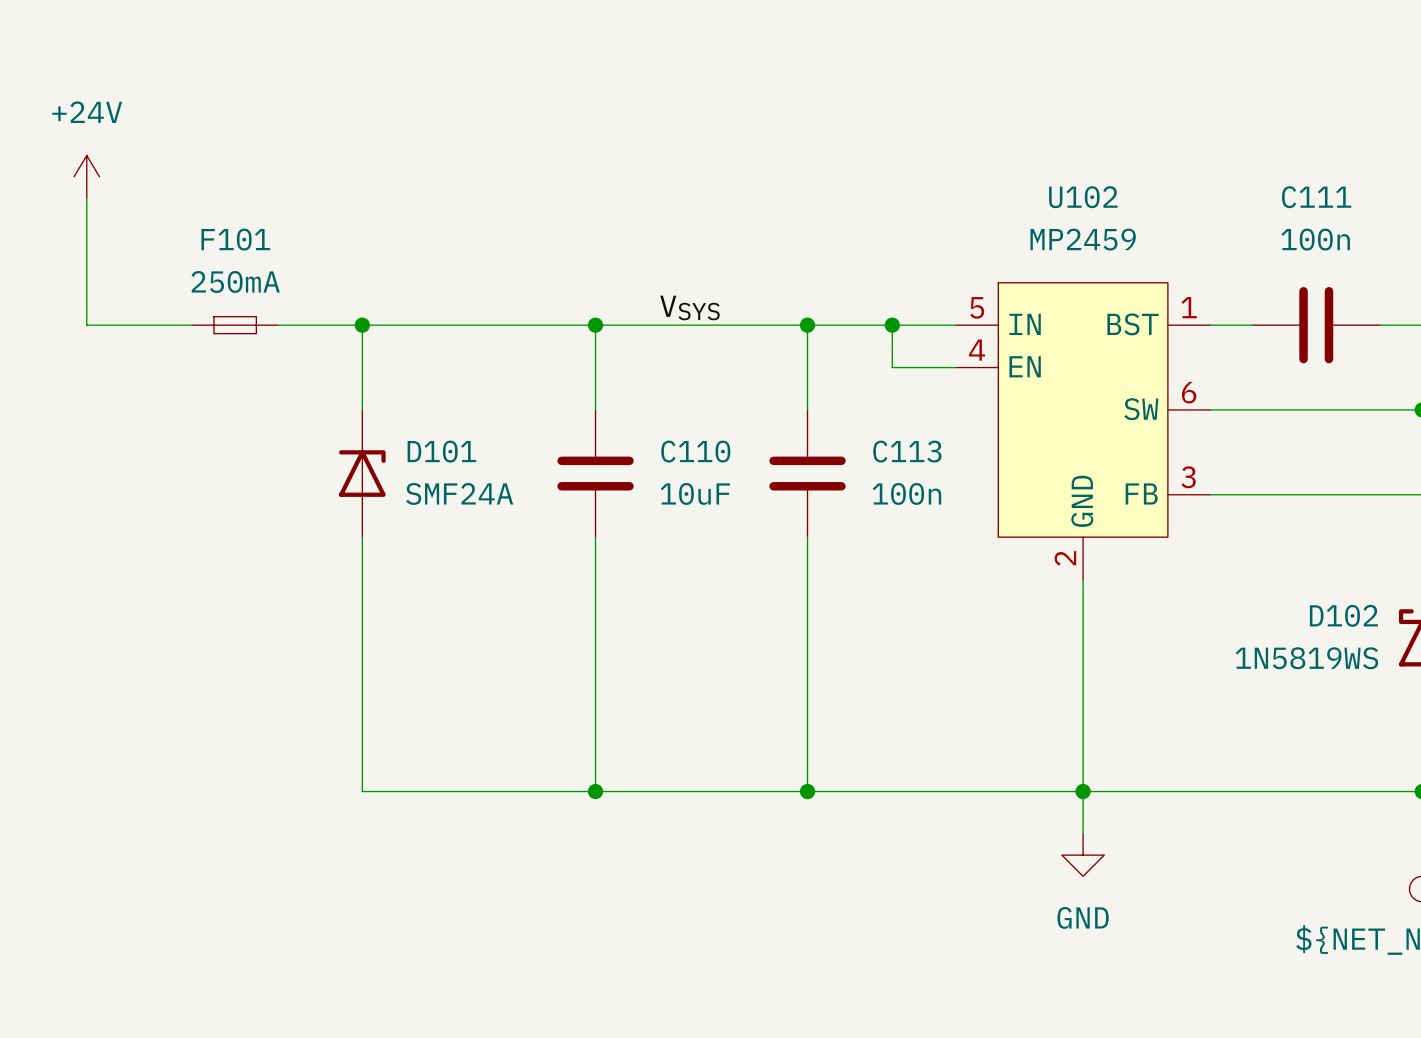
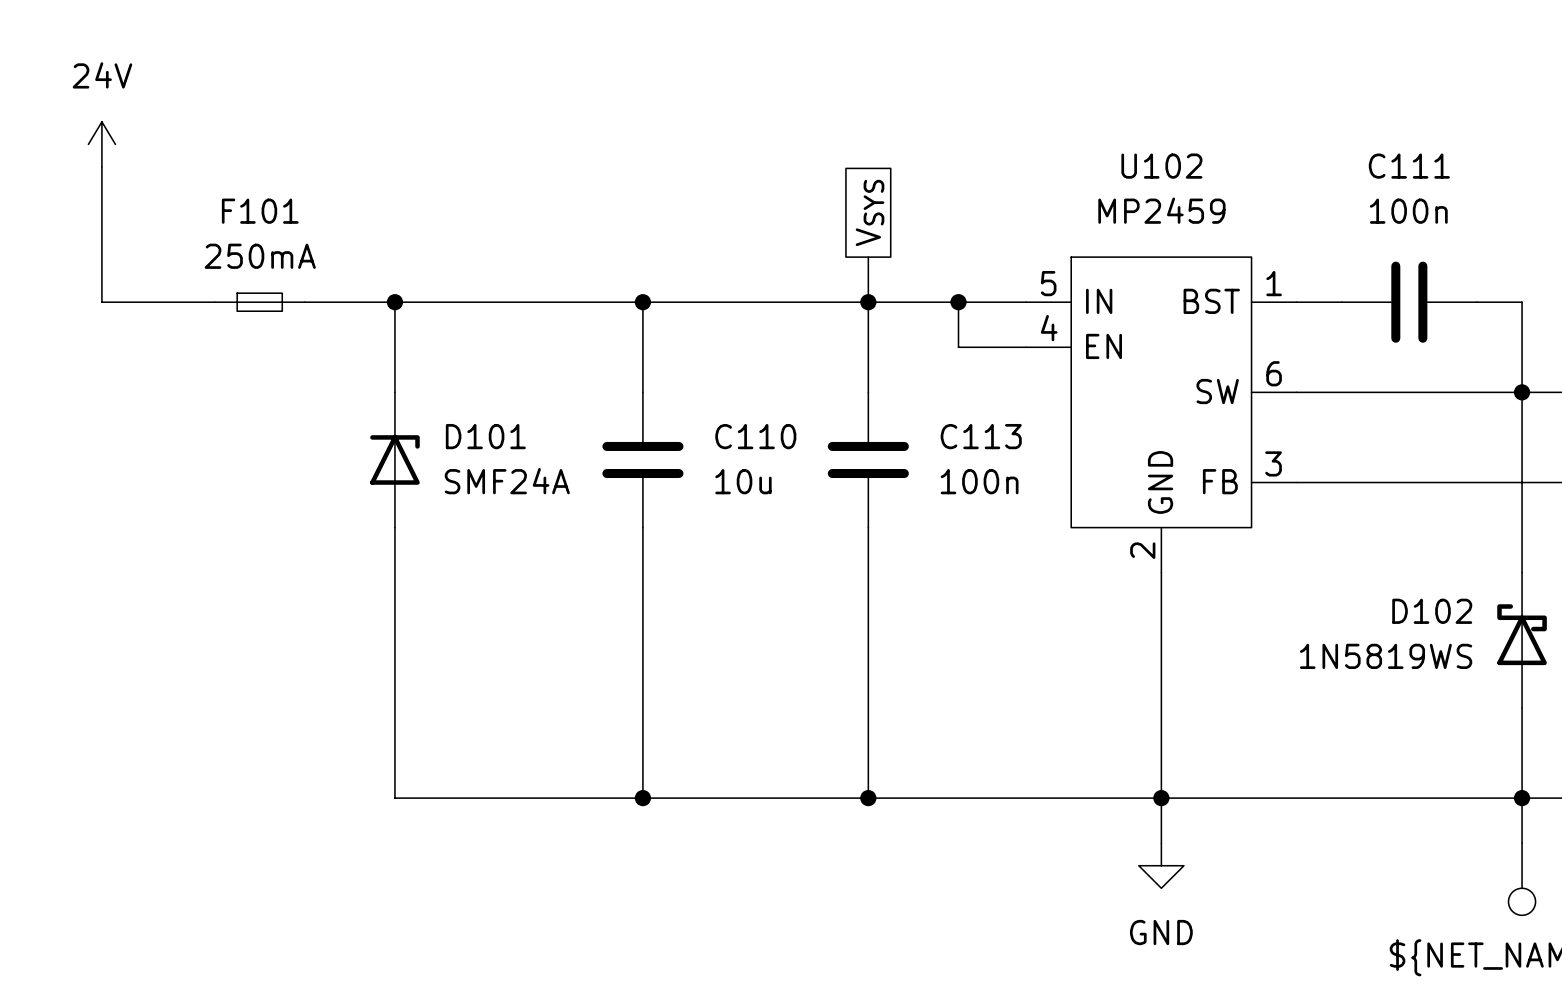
power symbol: +24V (86, 176) -> 24V (101, 144)
global label: none -> VSYS (870, 212)
wire: none -> (868, 257) (868, 302)
label: VSYS (689, 307) -> none
C110 value: 10uF (695, 493) -> 10u (743, 481)

